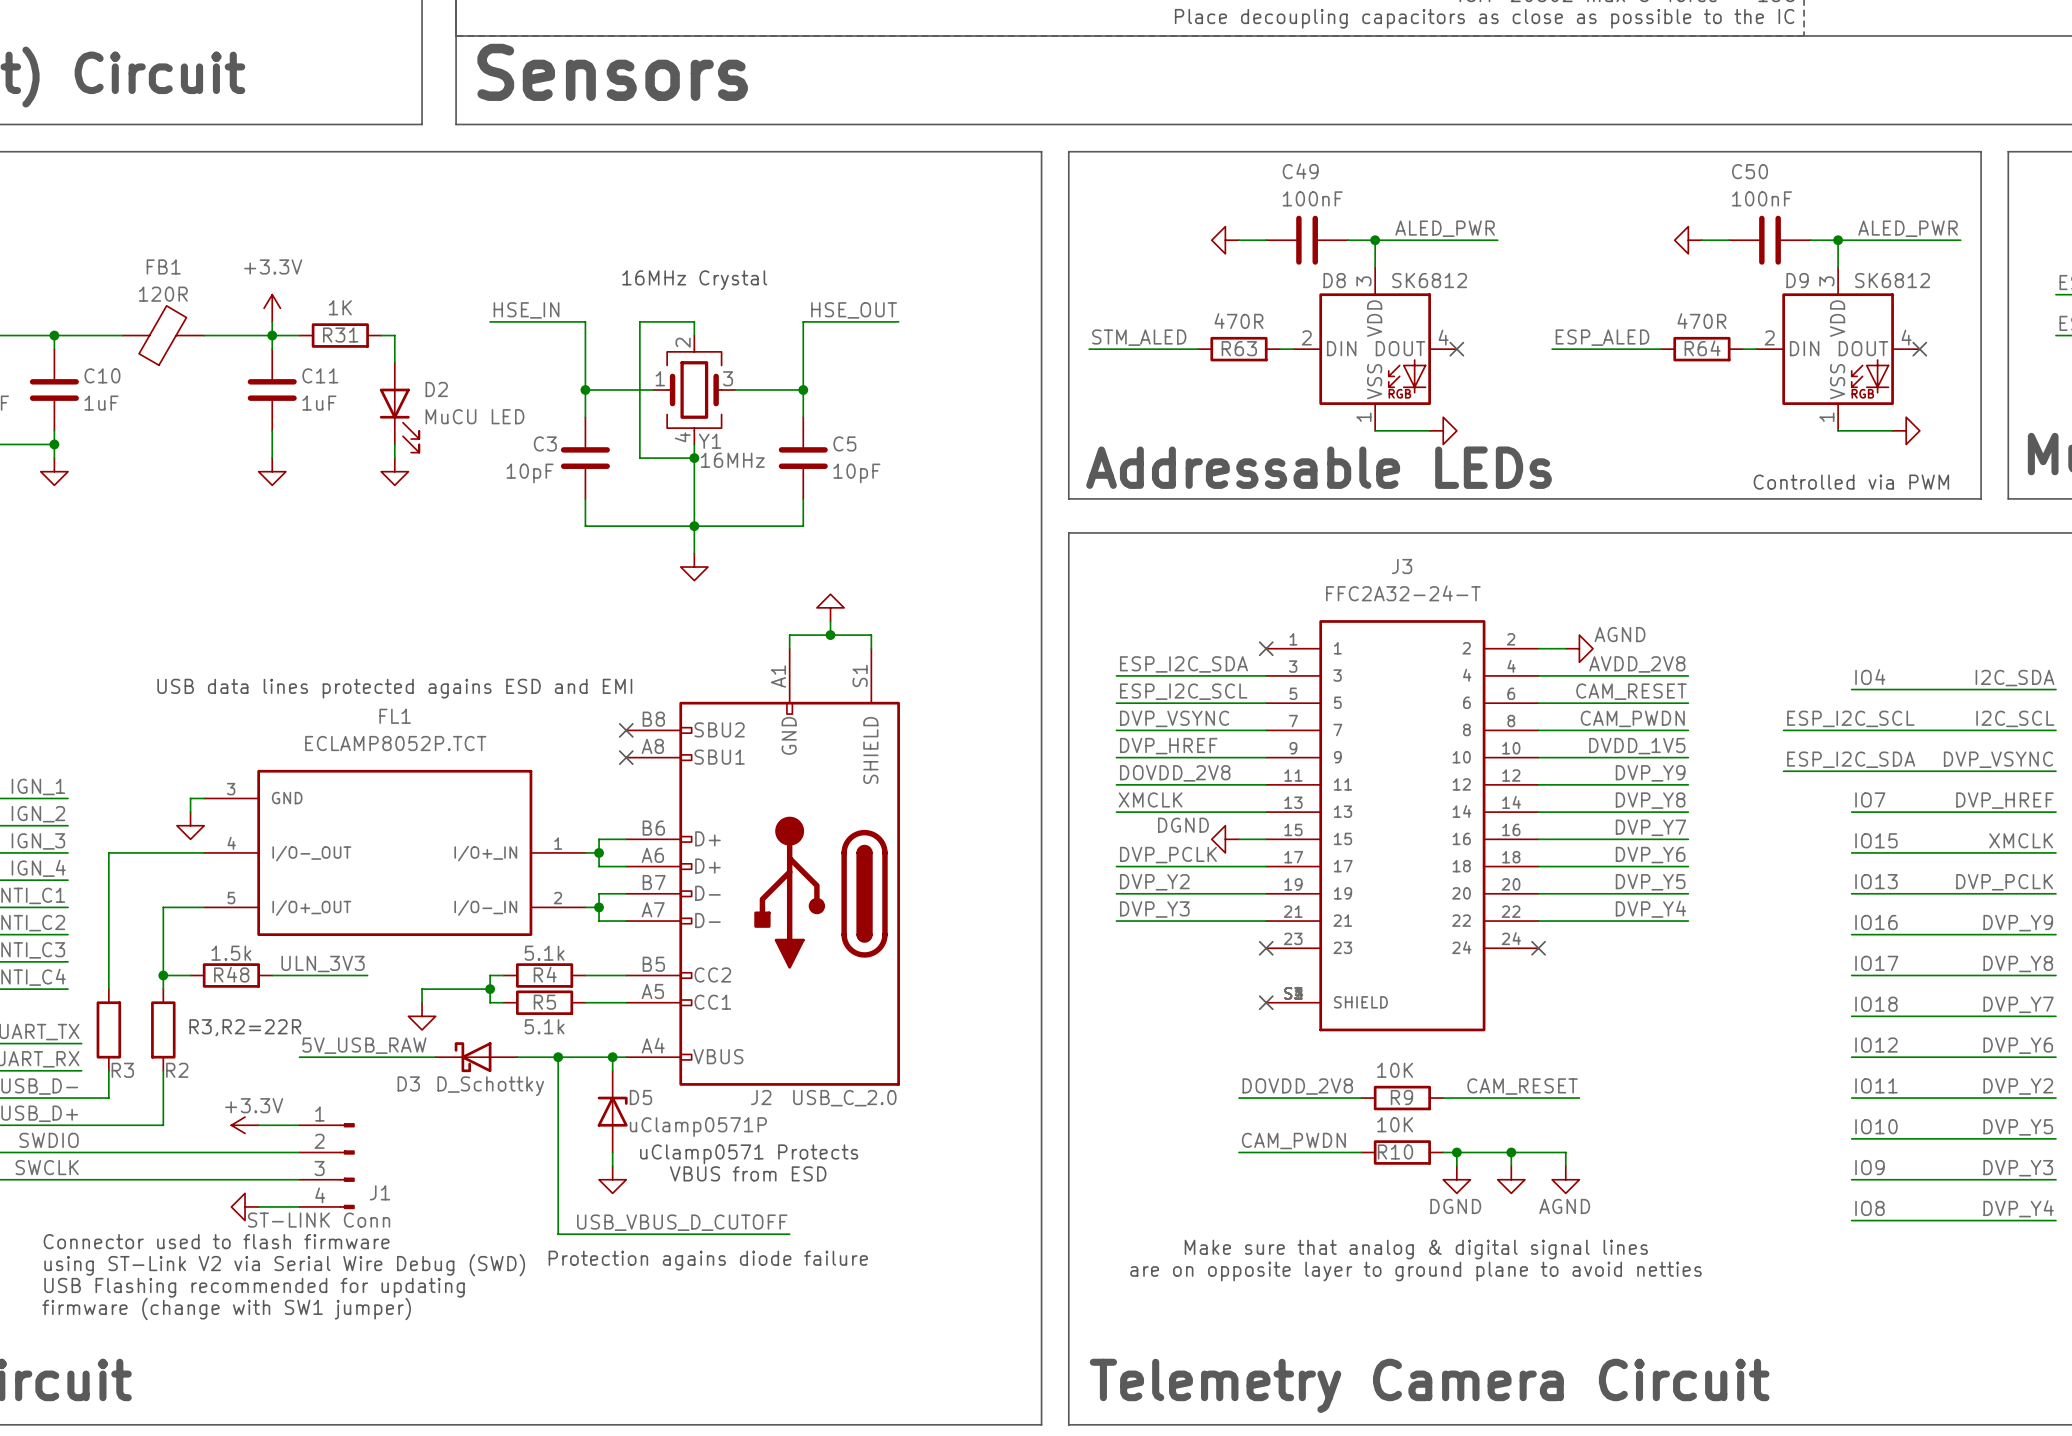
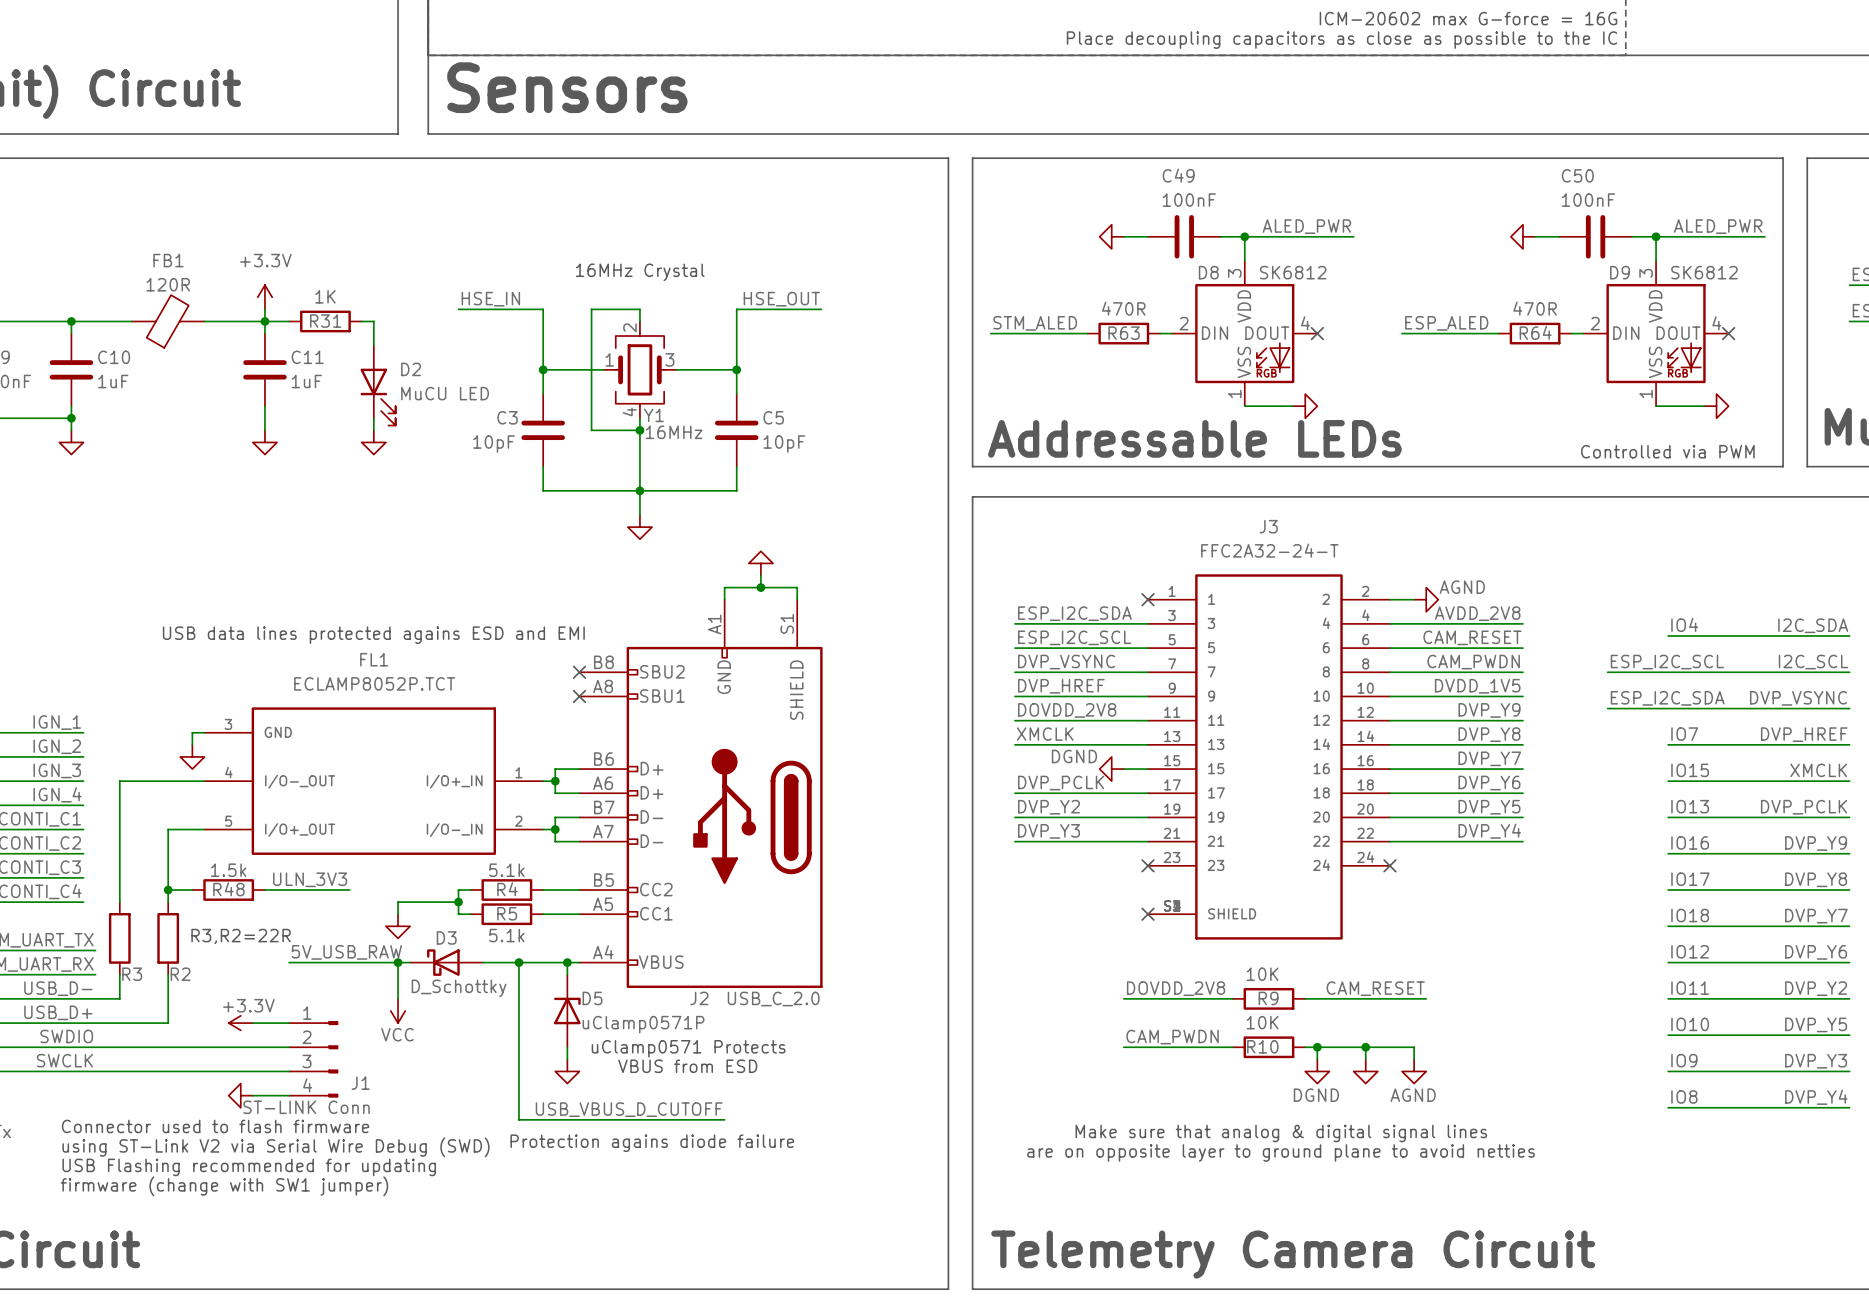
wire: none -> (398, 962) (398, 998)
junction: none -> (398, 962)
D3 name position: D3 (408, 1083) -> D3 (446, 937)
power symbol: none -> VCC (398, 1010)

